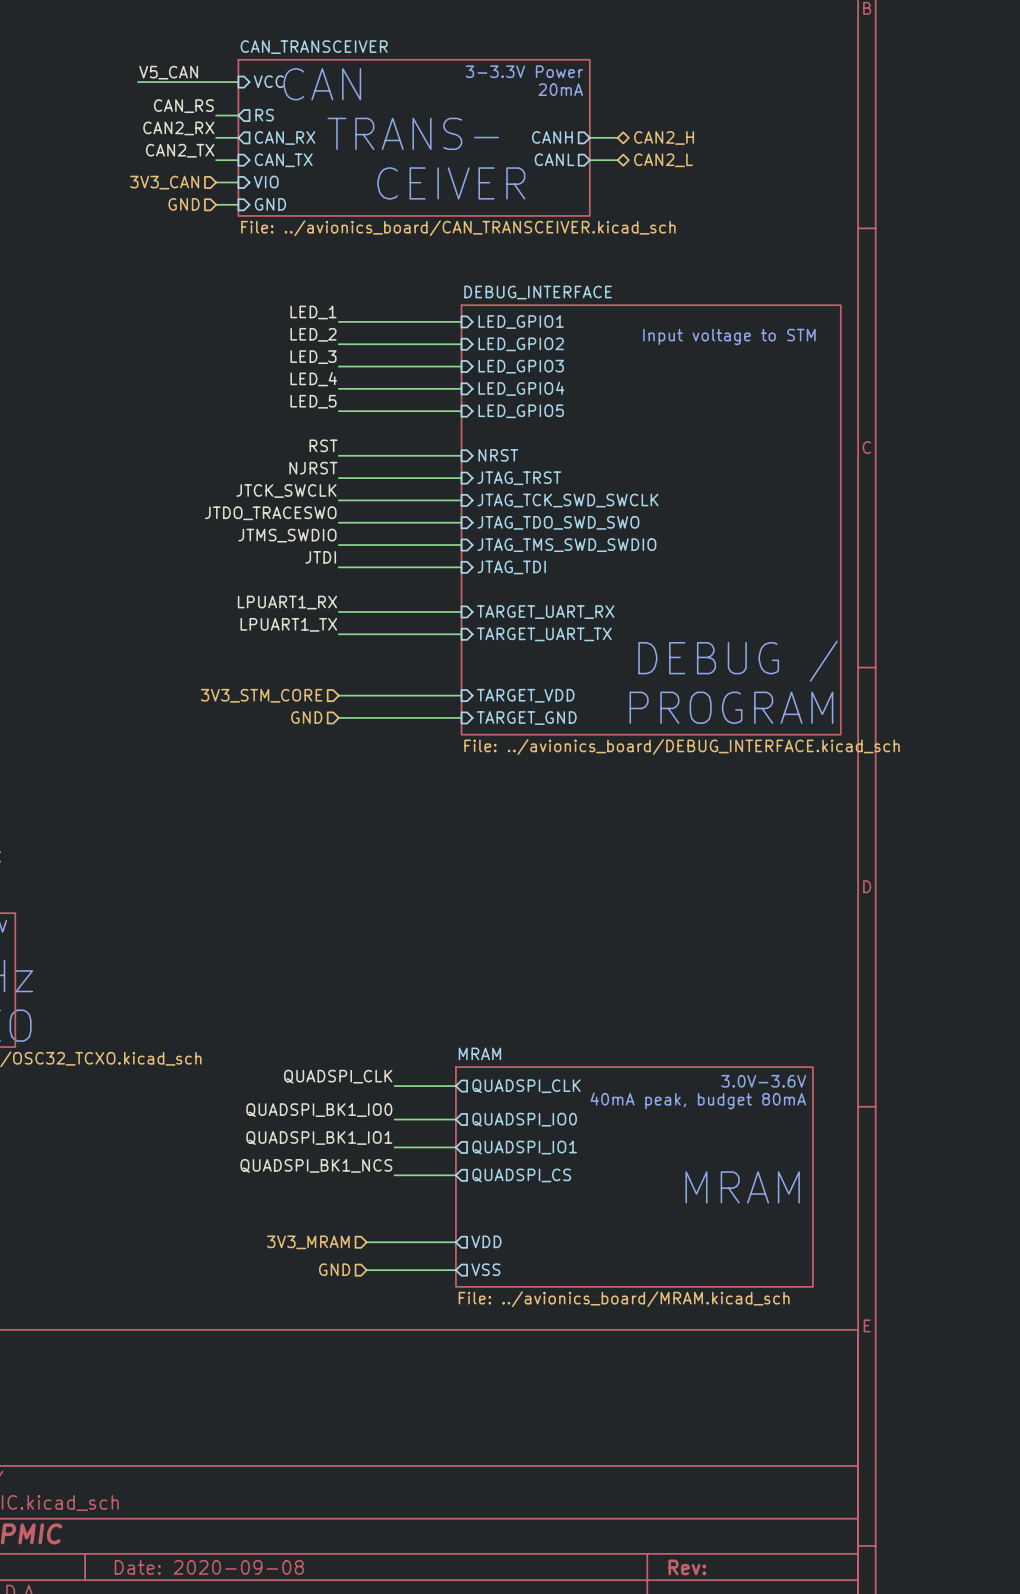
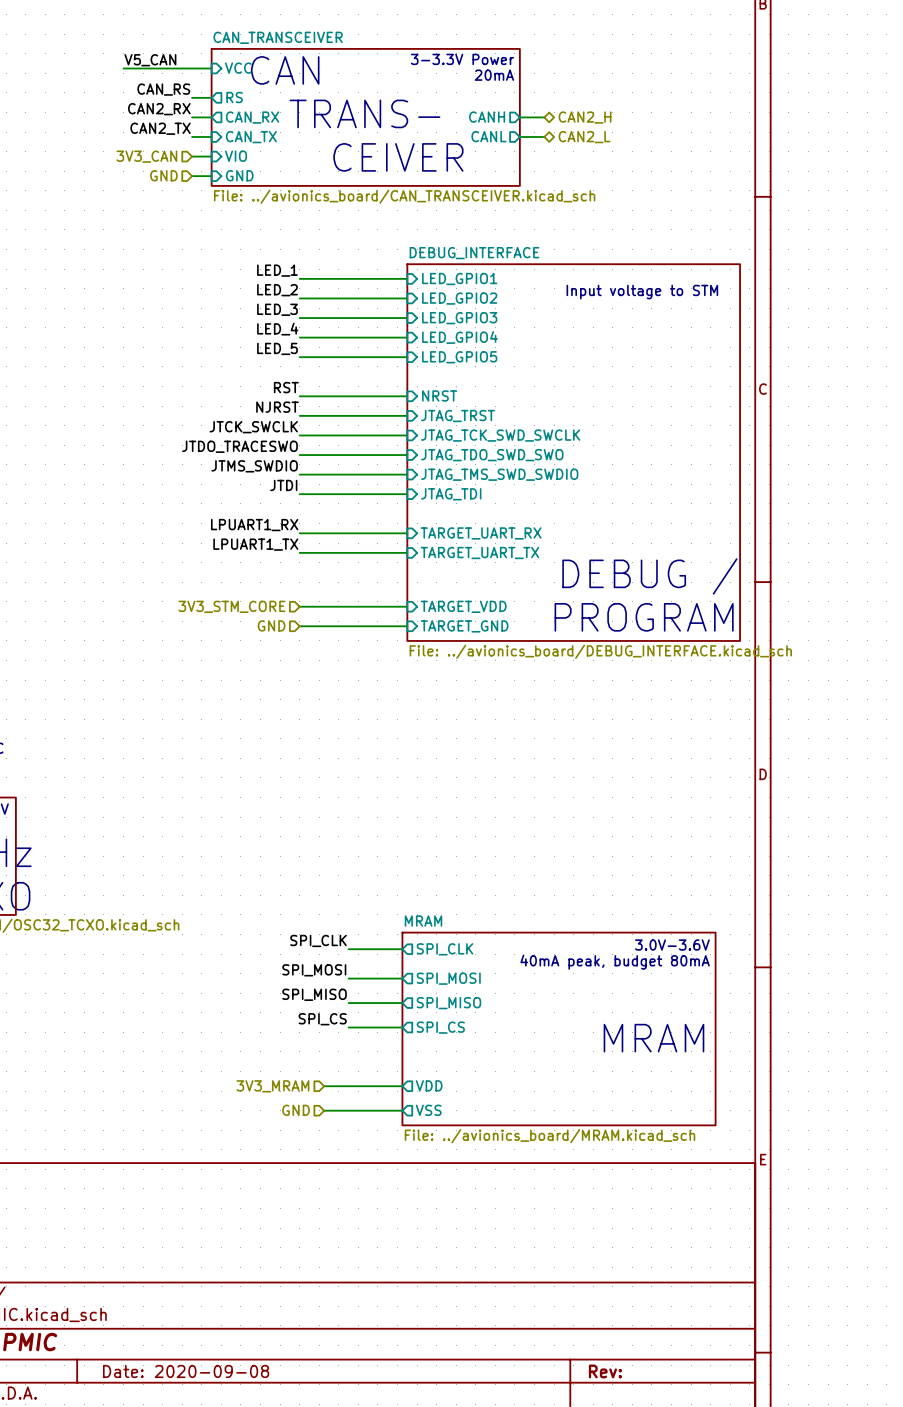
label: QUADSPI_CLK (338, 1076) -> SPI_CLK (318, 940)
sheet pin: QUADSPI_CLK (526, 1086) -> SPI_CLK (445, 949)
label: QUADSPI_BK1_IO0 (319, 1110) -> SPI_MOSI (314, 970)
sheet pin: QUADSPI_IO0 (524, 1119) -> SPI_MOSI (448, 978)
label: QUADSPI_BK1_IO1 (319, 1138) -> SPI_MISO (314, 994)
sheet pin: QUADSPI_IO1 (524, 1147) -> SPI_MISO (448, 1003)
label: QUADSPI_BK1_NCS (316, 1165) -> SPI_CS (322, 1019)
sheet pin: QUADSPI_CS (521, 1175) -> SPI_CS (440, 1027)

